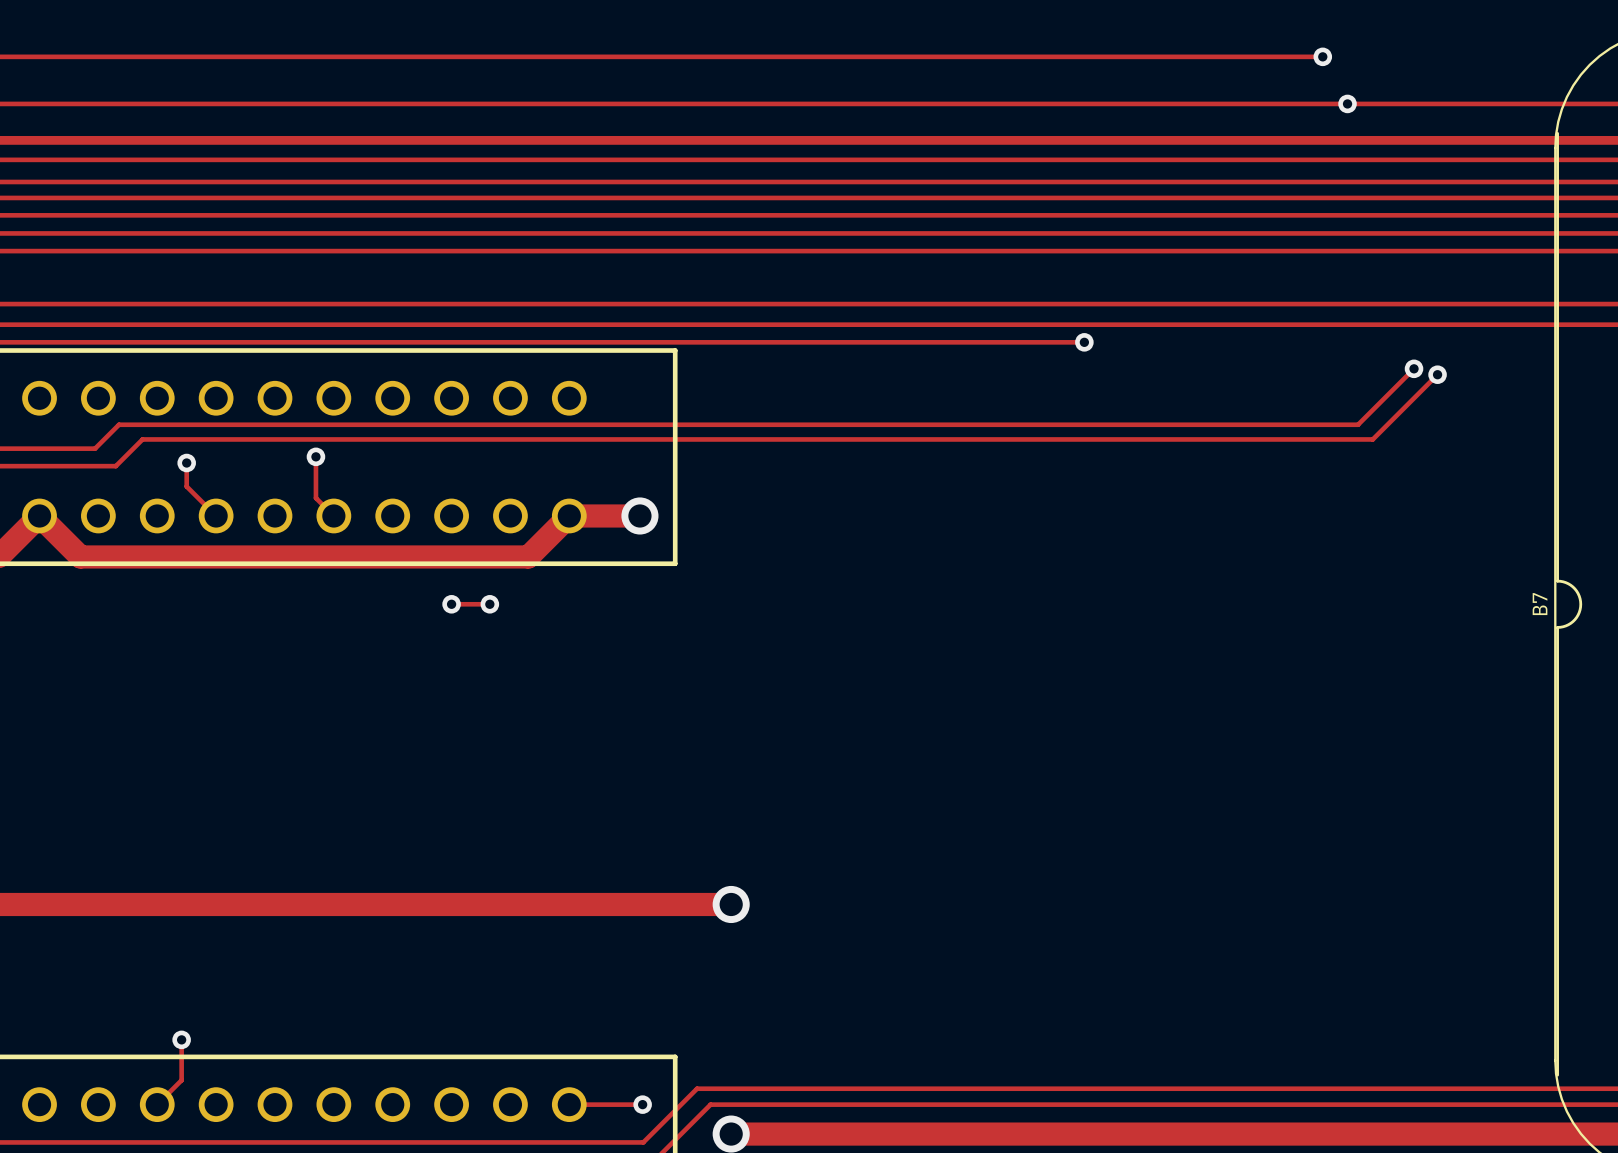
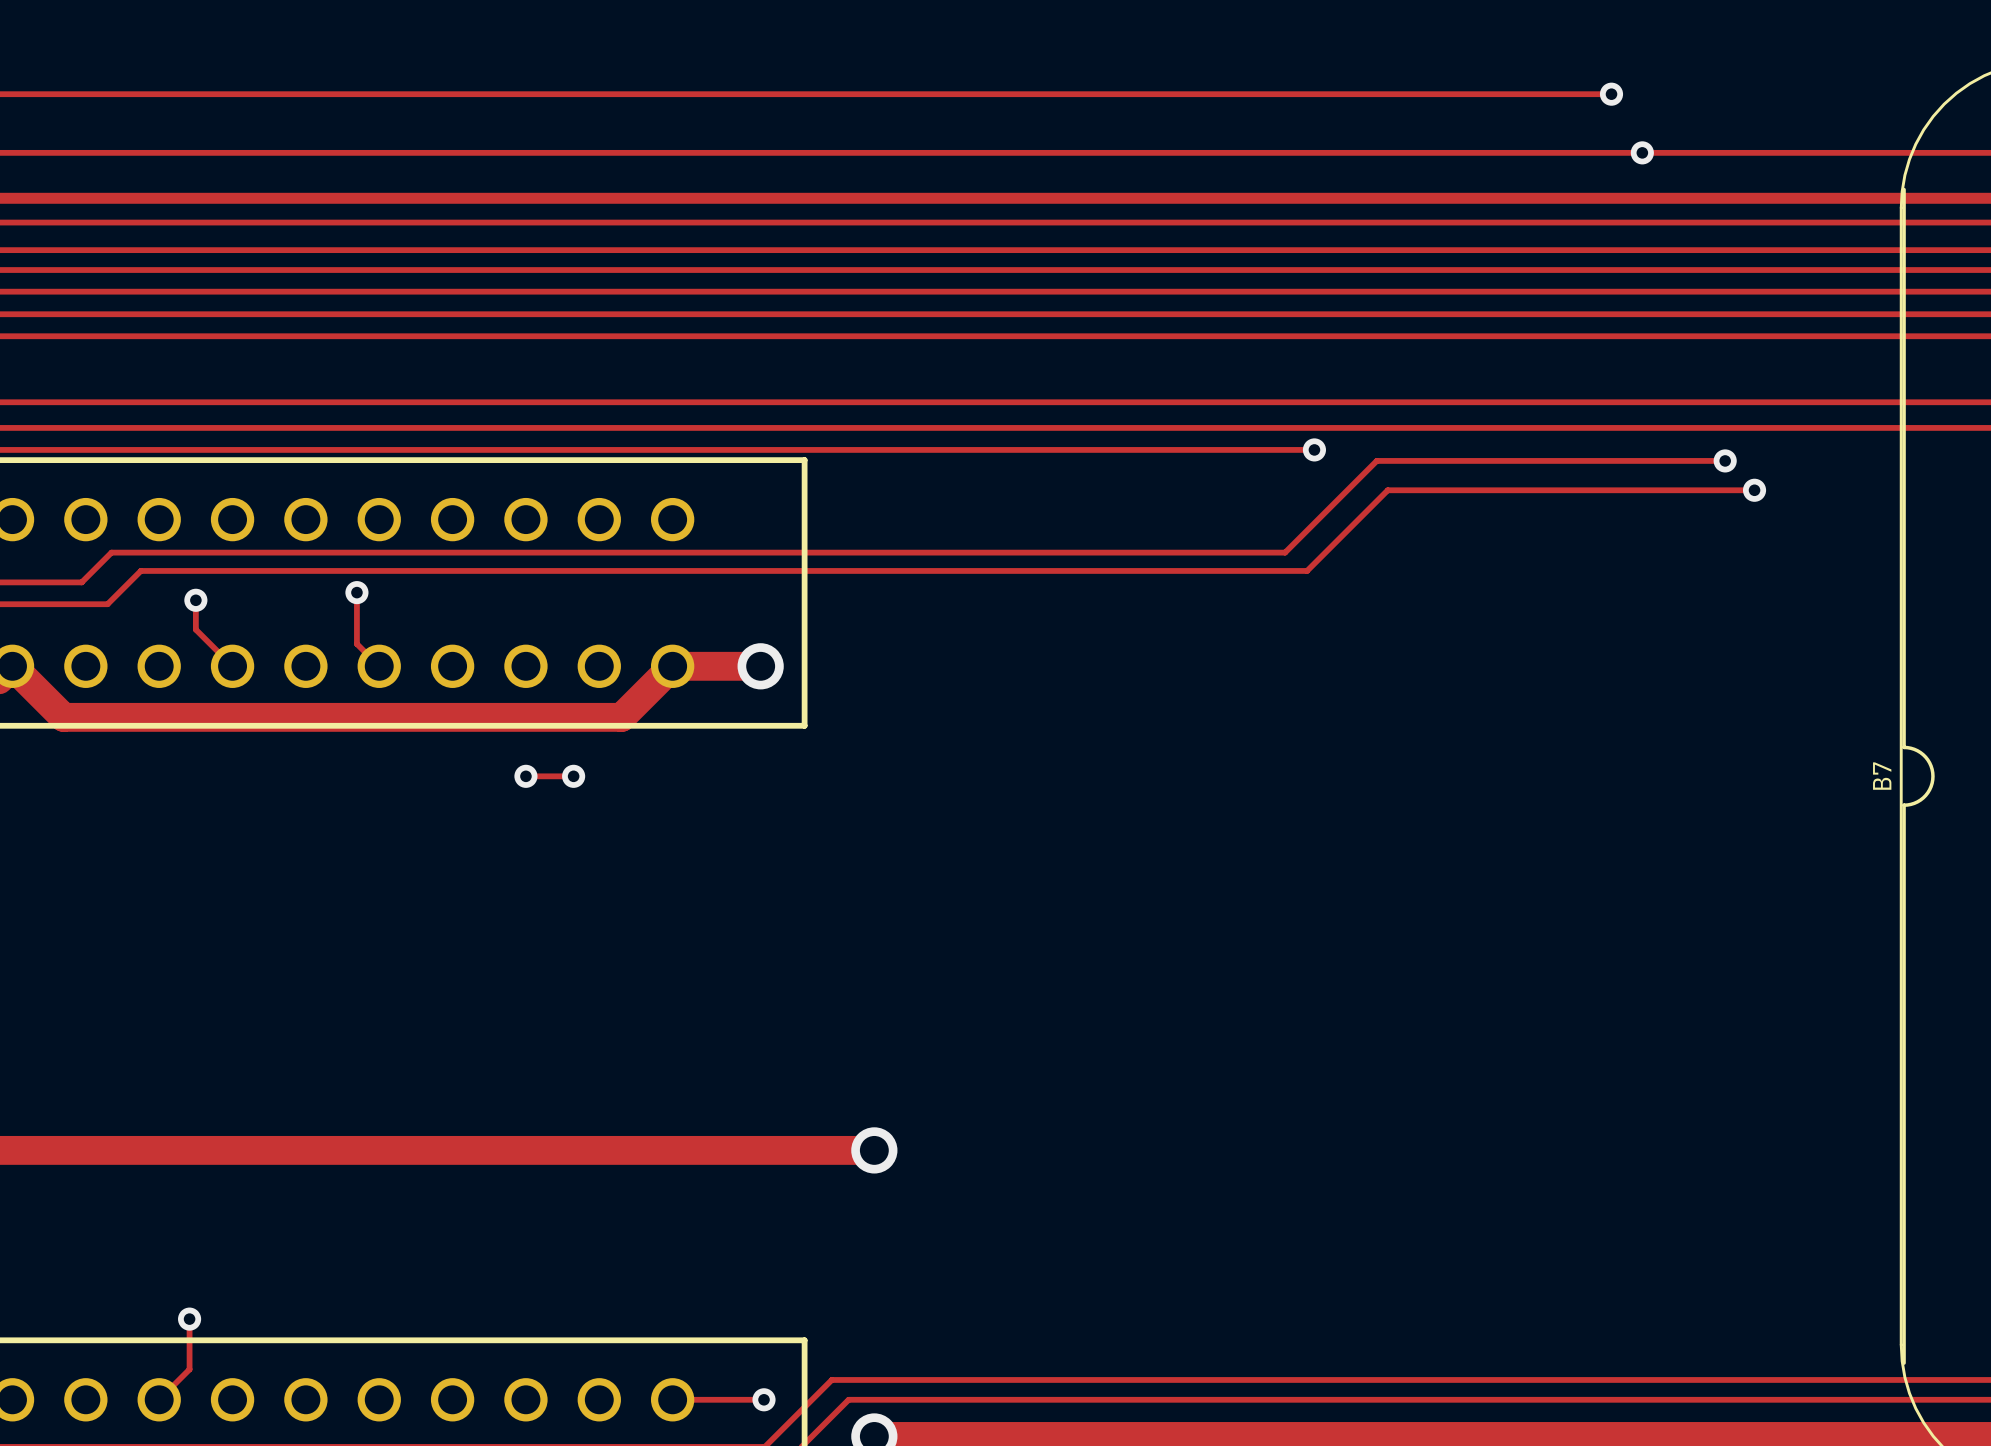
track: (1414, 368) (1358, 424) (1060, 424) -> (1725, 460) (1376, 460) (1285, 552)
via position: (1414, 368) -> (1725, 460)
track: (1437, 374) (1372, 439) (1078, 439) -> (1754, 490) (1387, 490) (1307, 570)

